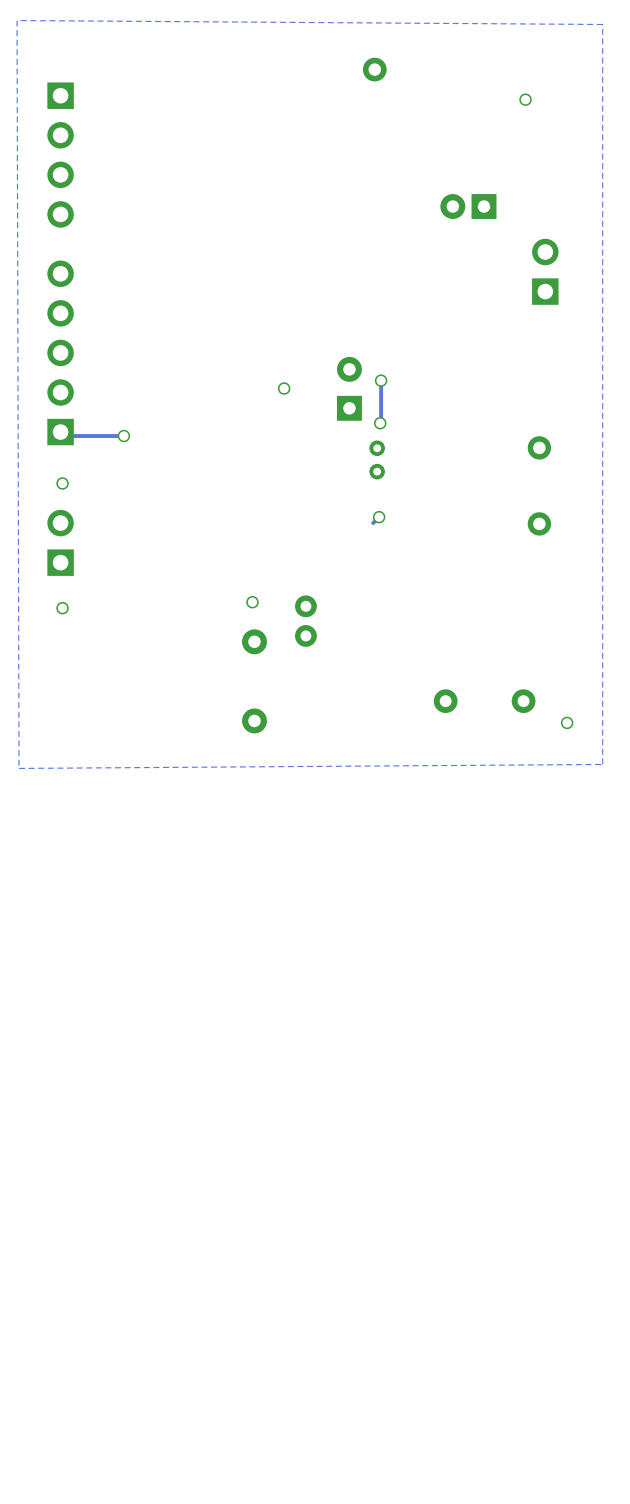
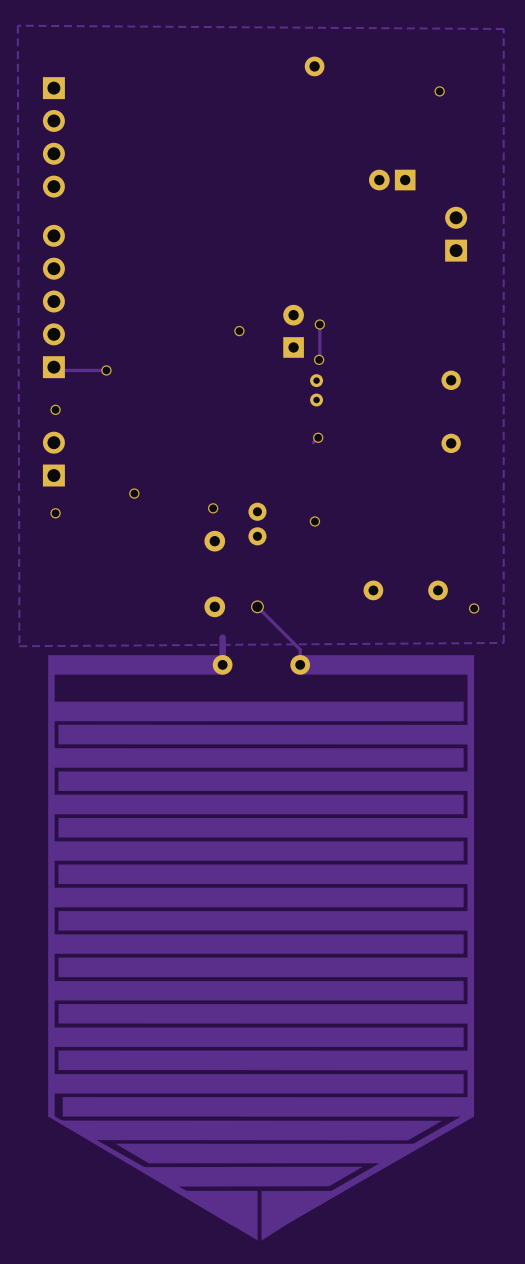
via: none -> (134, 493)
via: none -> (314, 521)
track: none -> (257, 606) (300, 649) (300, 664)
via: none -> (257, 606)
track: none -> (222, 637) (222, 664)
part: none -> (261, 947)

